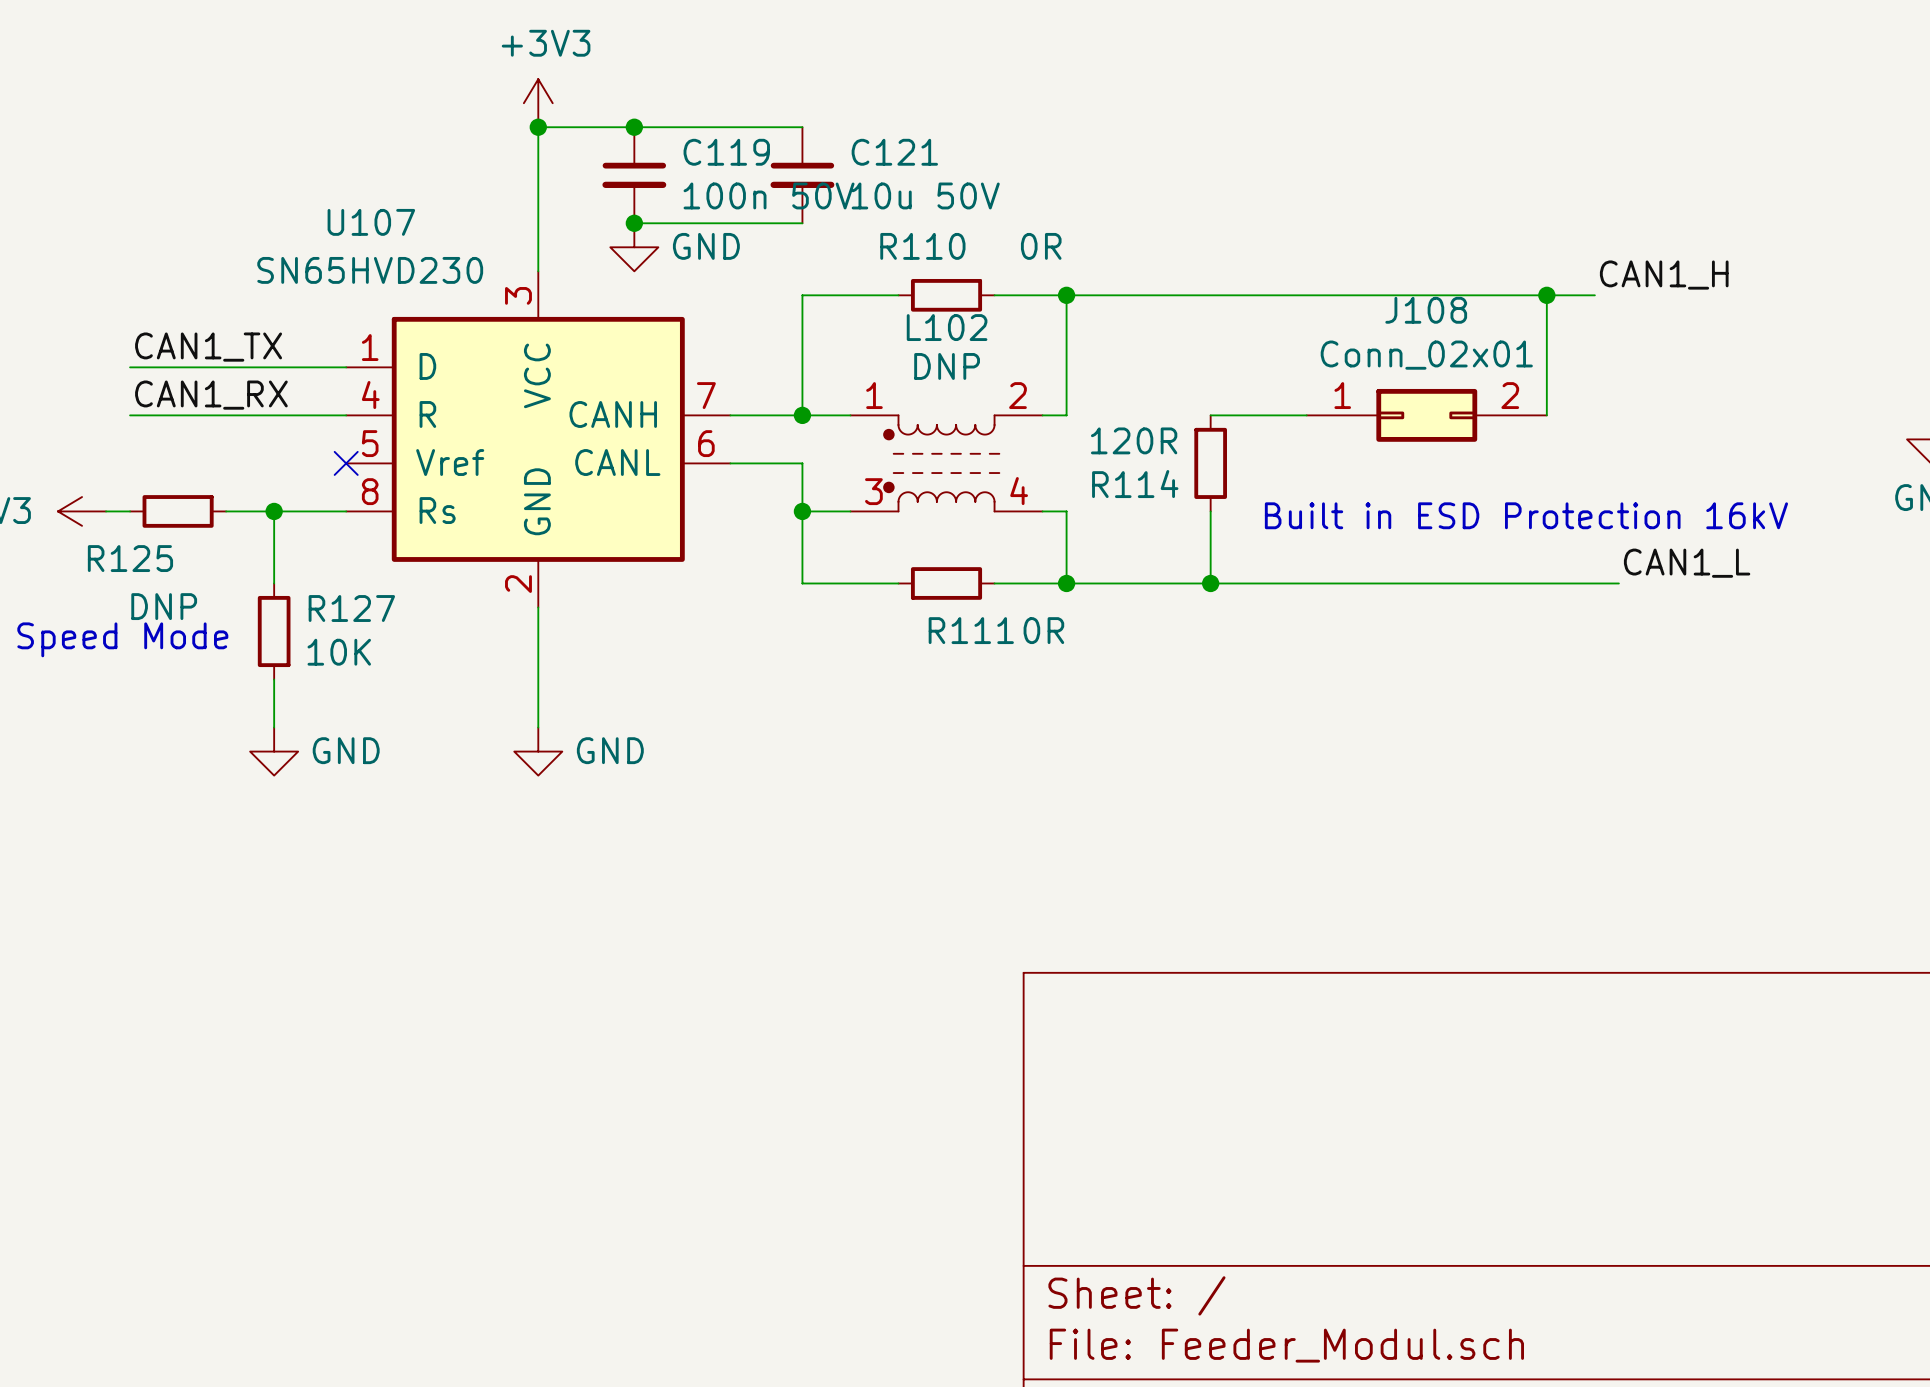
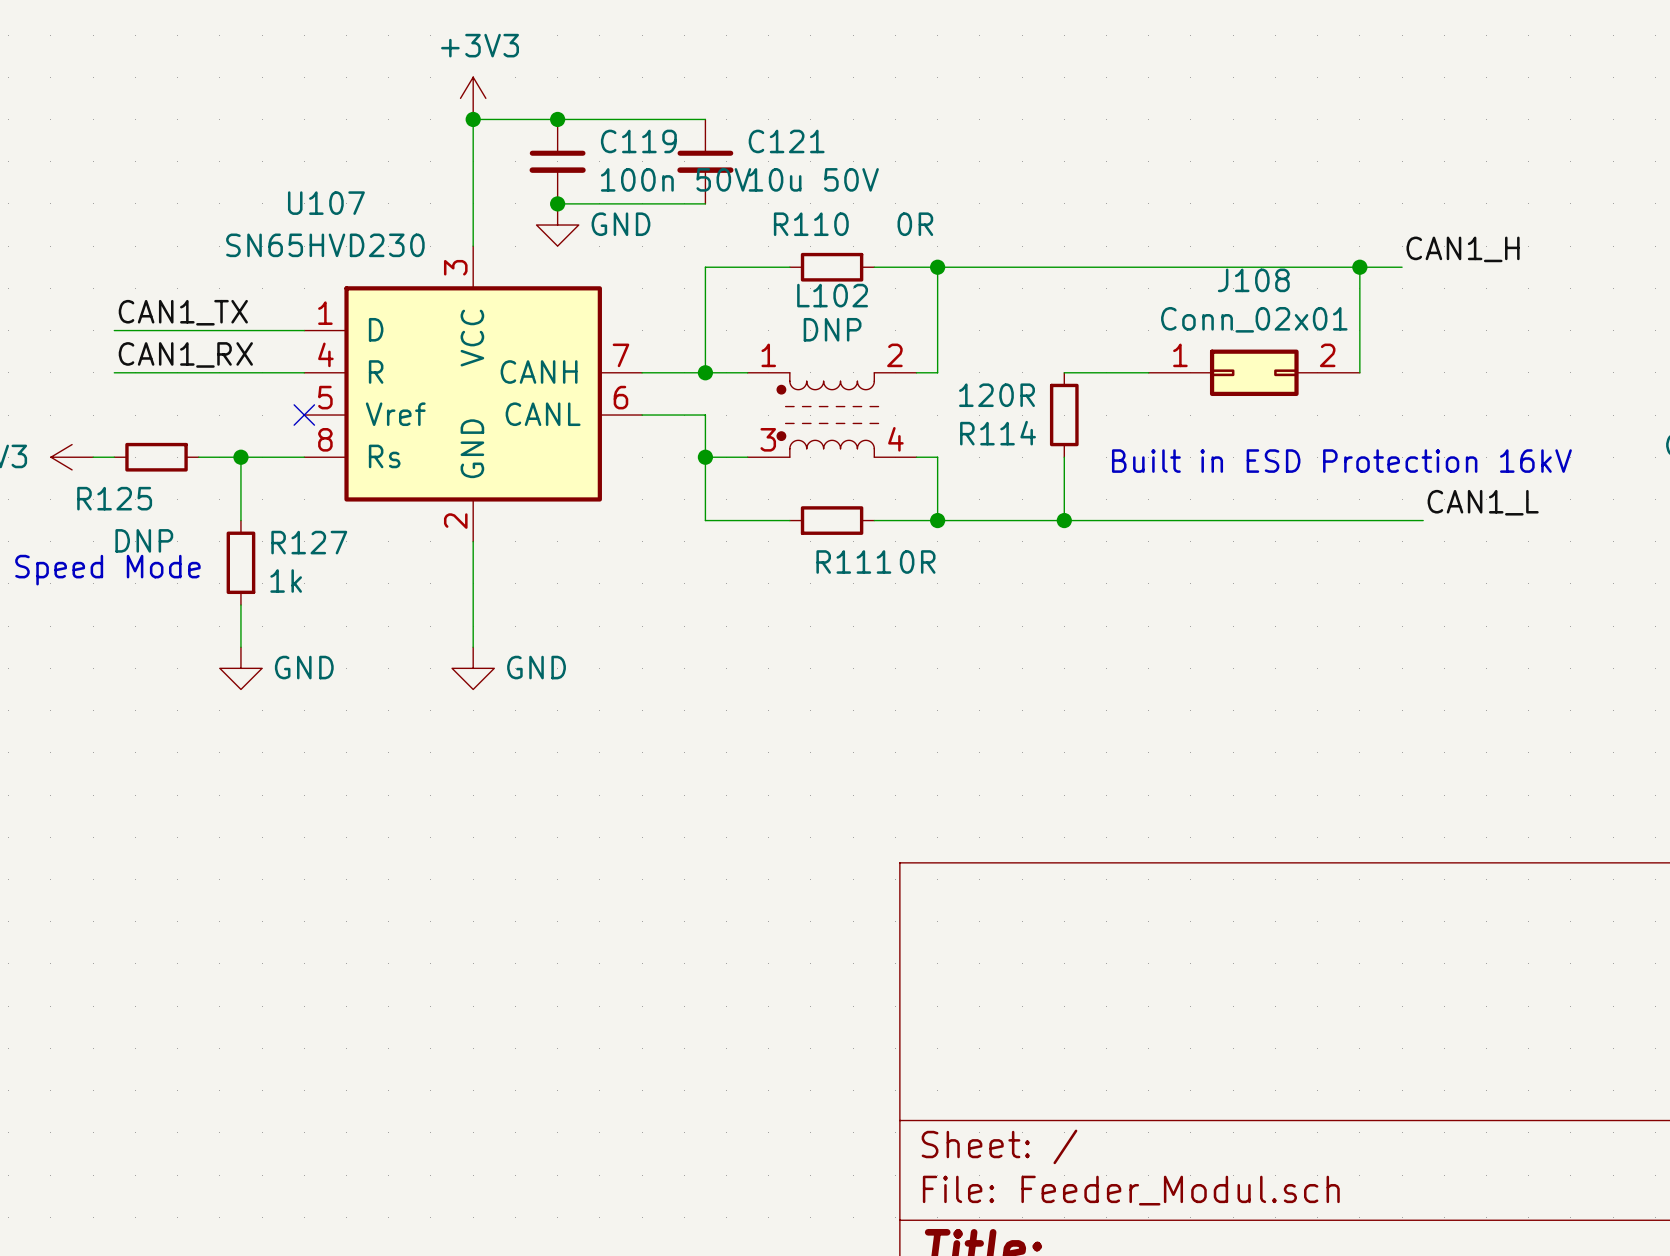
R127 value: 10K (339, 652) -> 1k (286, 581)

